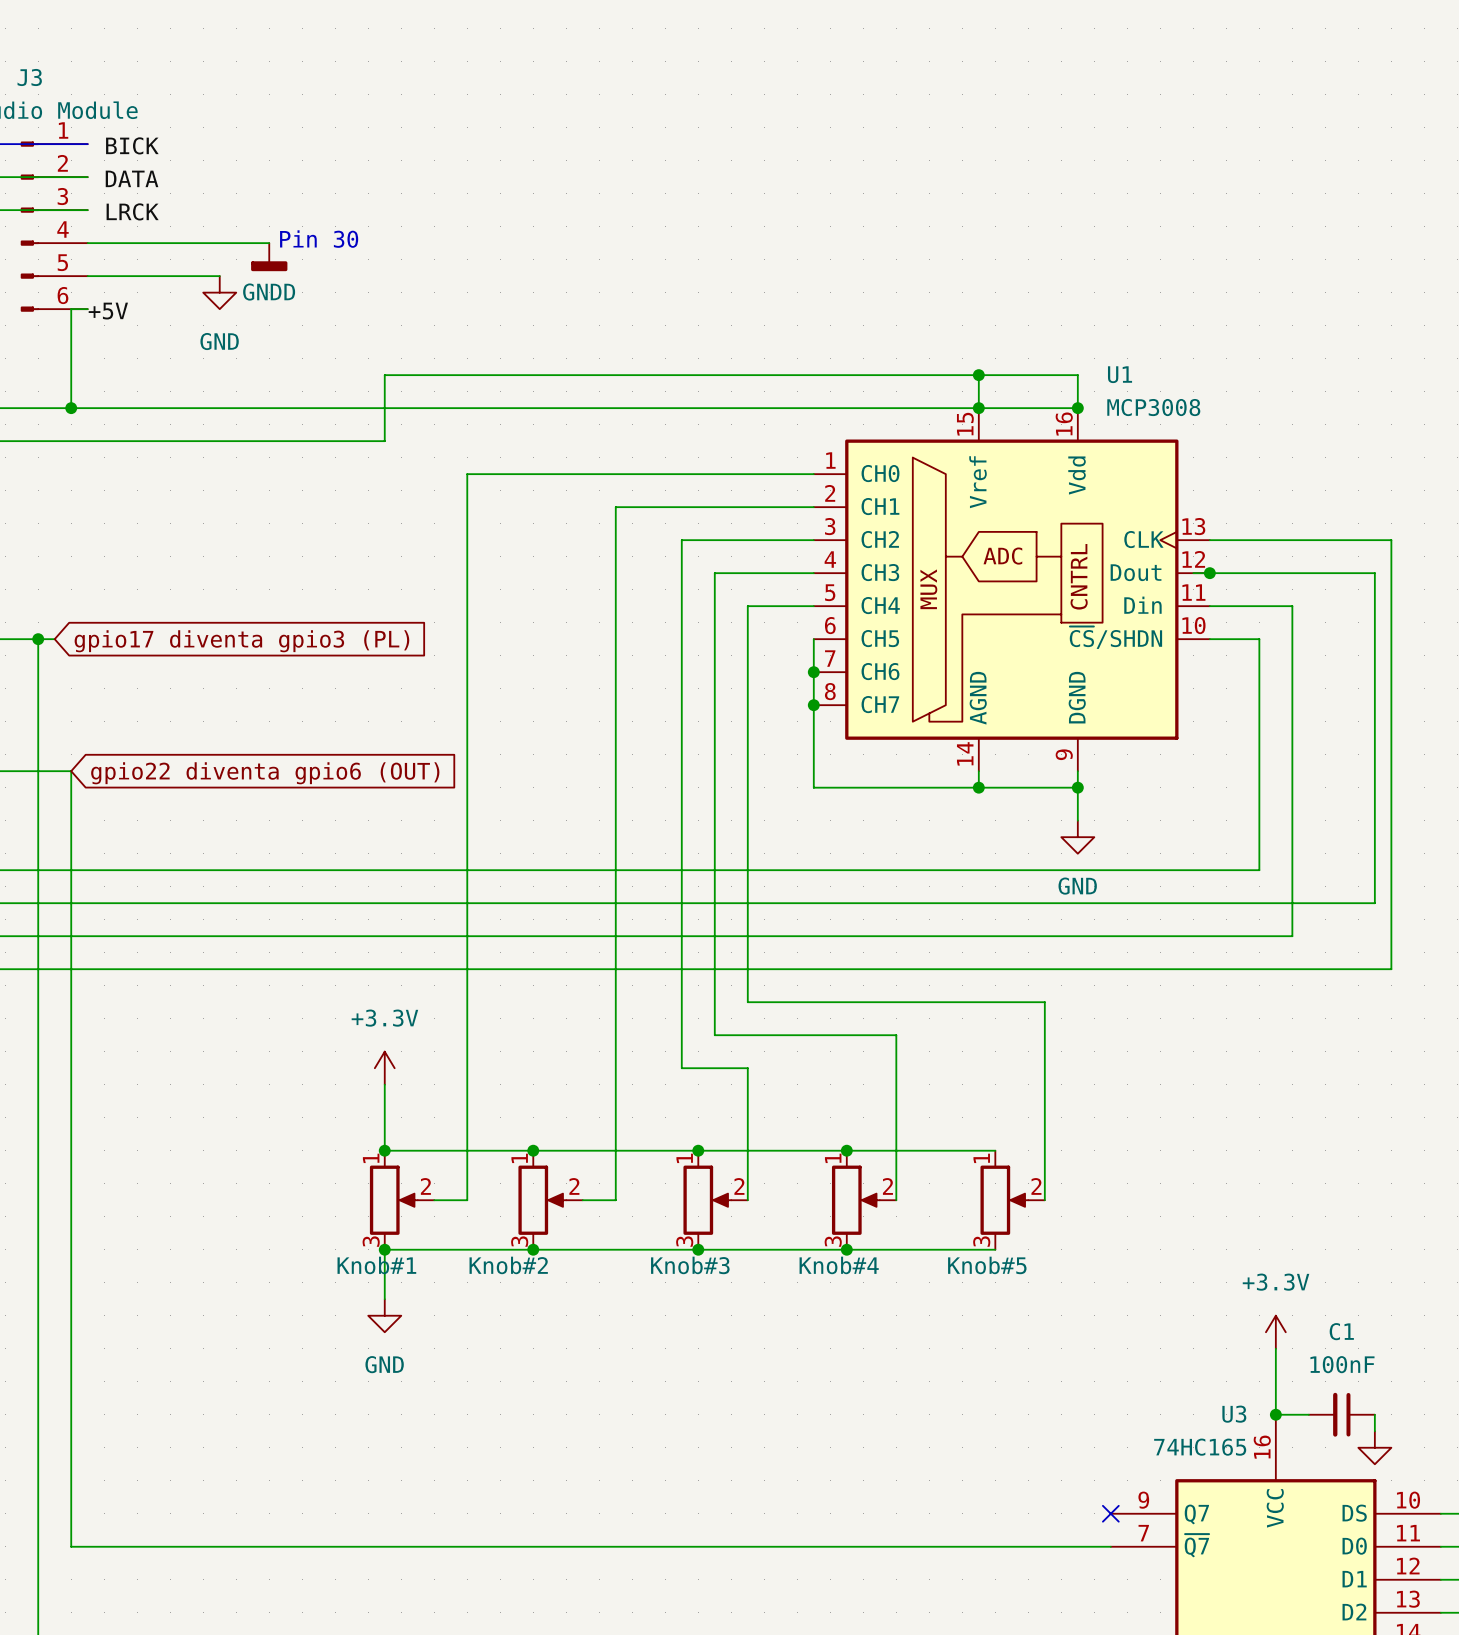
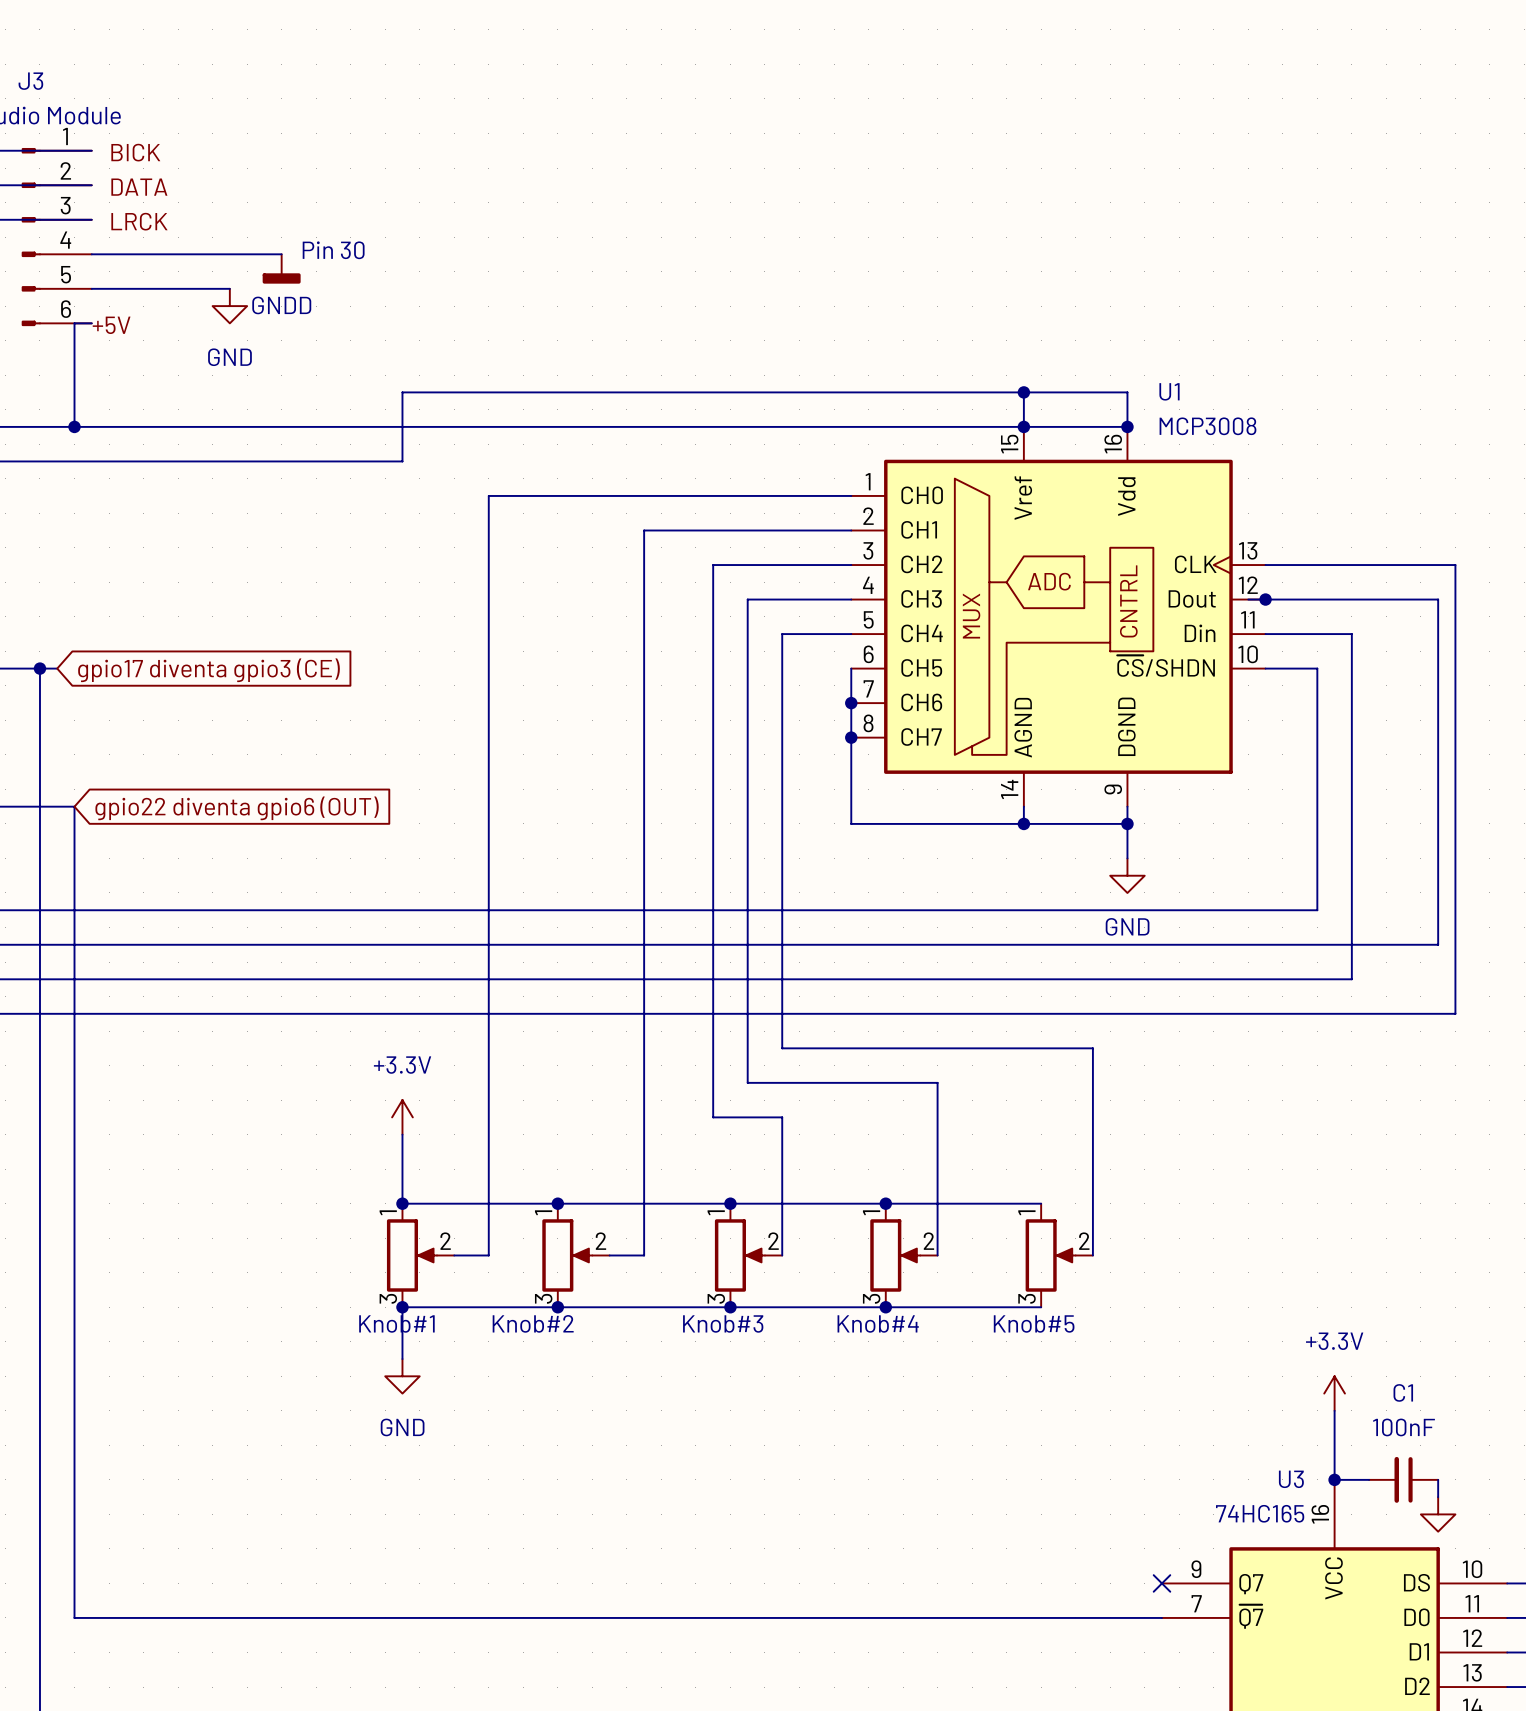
global label: gpio17 diventa gpio3 (PL) (241, 641) -> gpio17 diventa gpio3 (CE) (209, 670)

